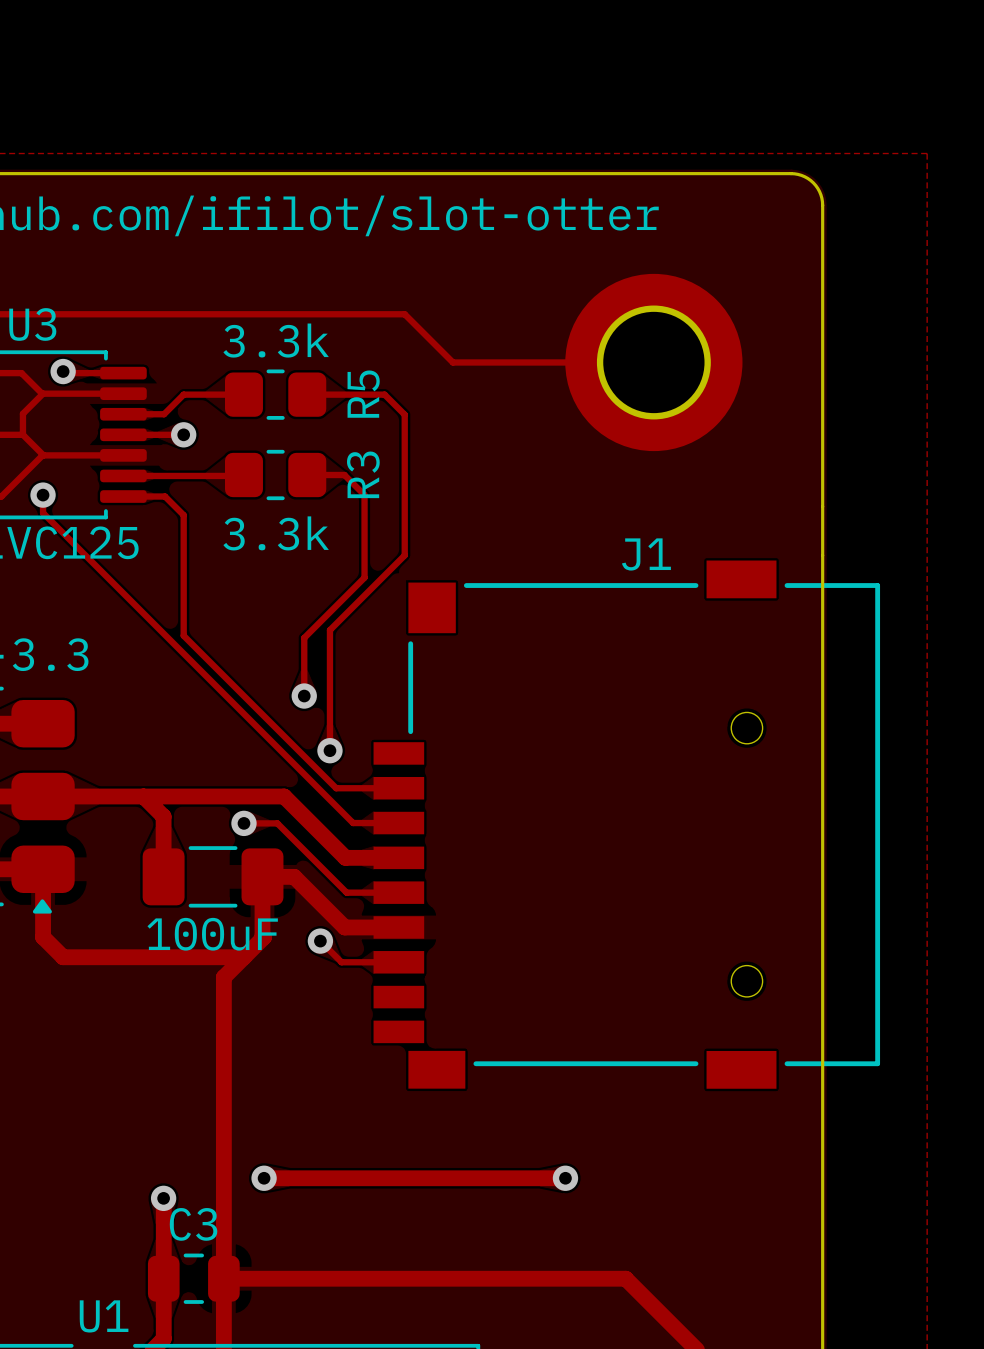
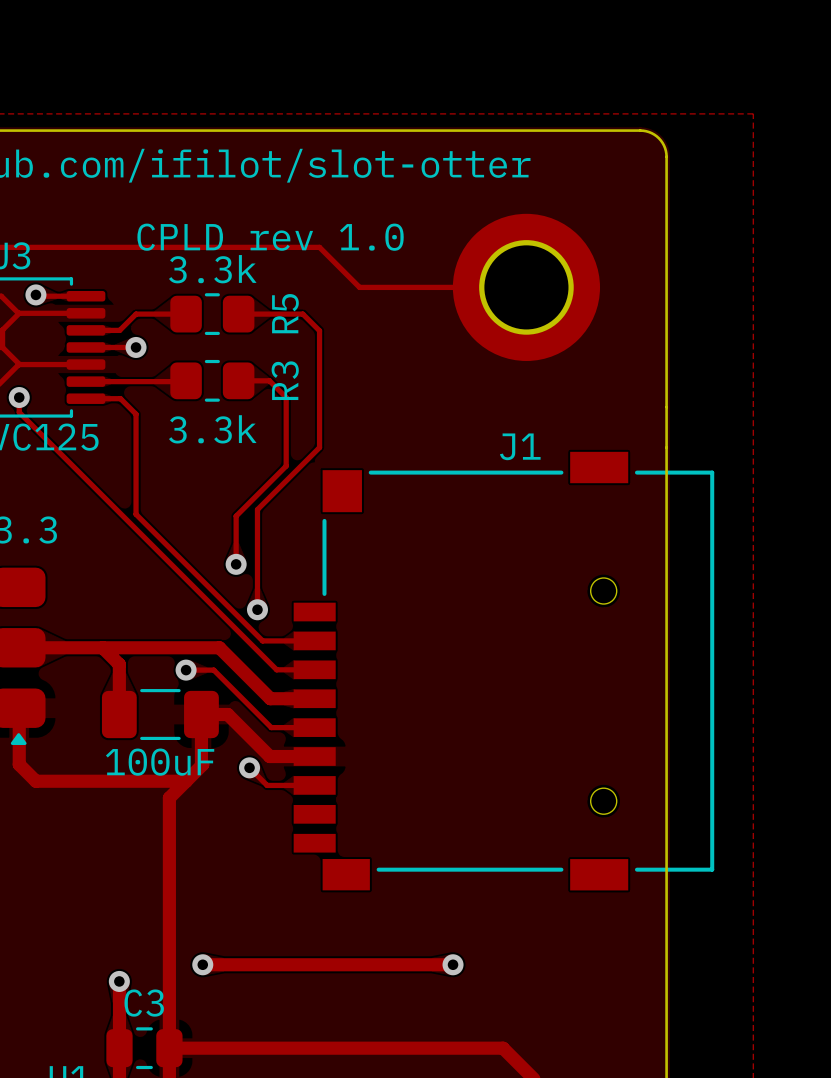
text: none -> CPLD rev 1.0 (270, 237)

